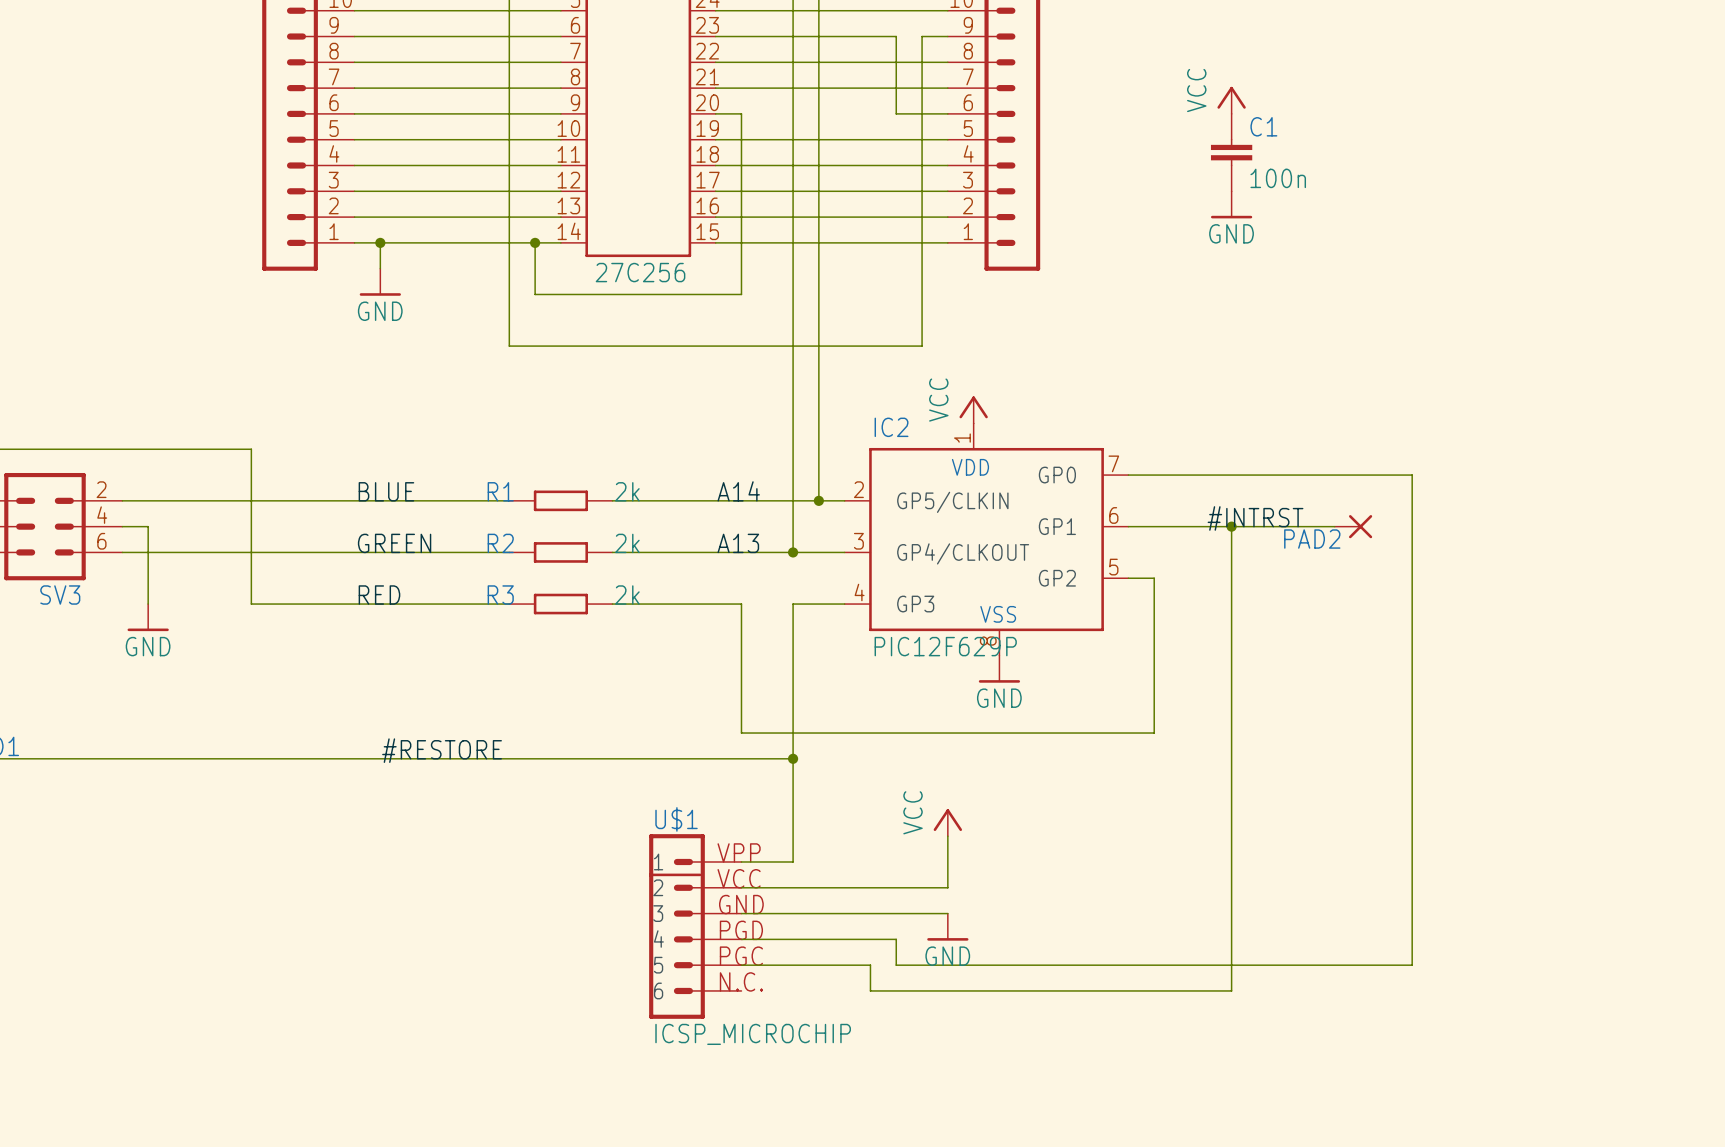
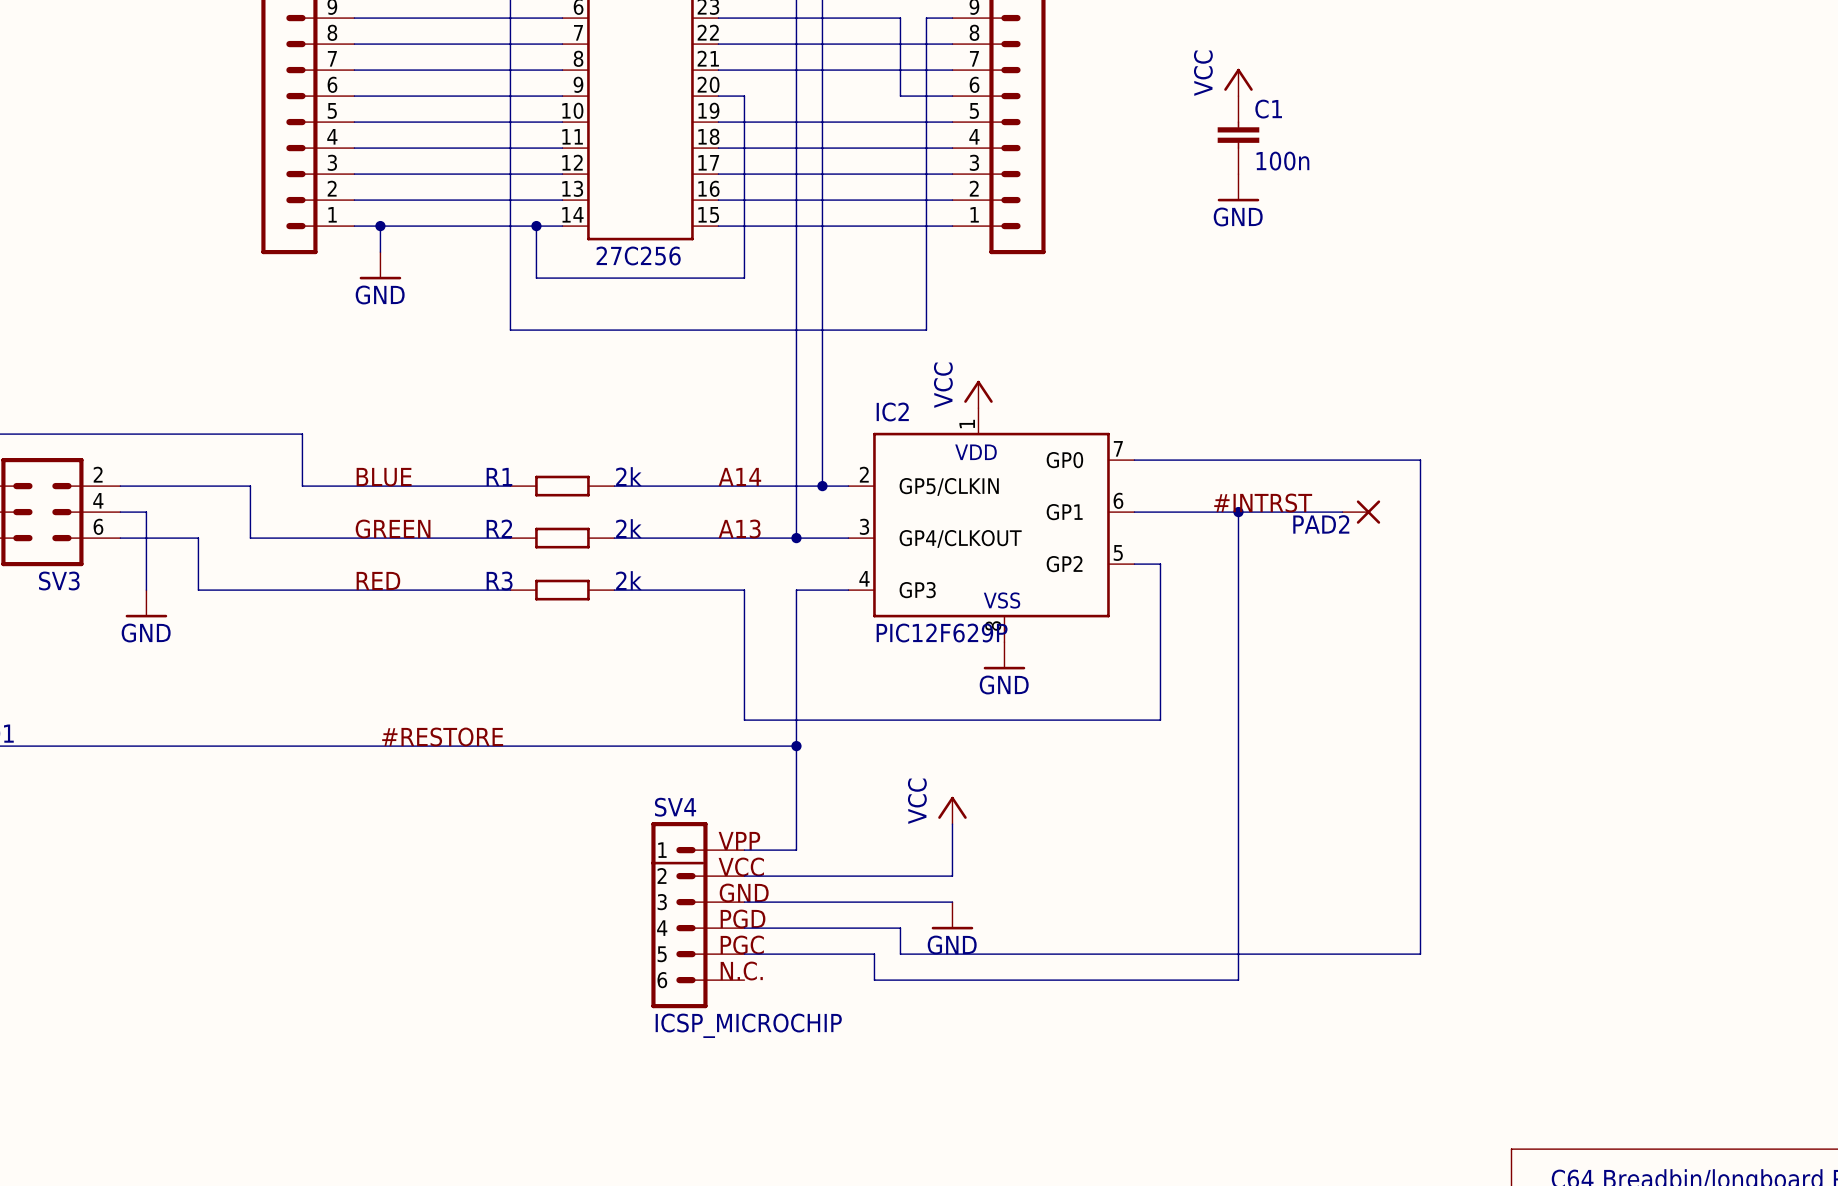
wire: (251, 449) (251, 500) (302, 500) -> (250, 434) (302, 434) (302, 486)
wire: (199, 552) (251, 552) (251, 604) -> (198, 538) (198, 590) (250, 590)
U$1 name: U$1 (676, 819) -> SV4 (675, 807)

